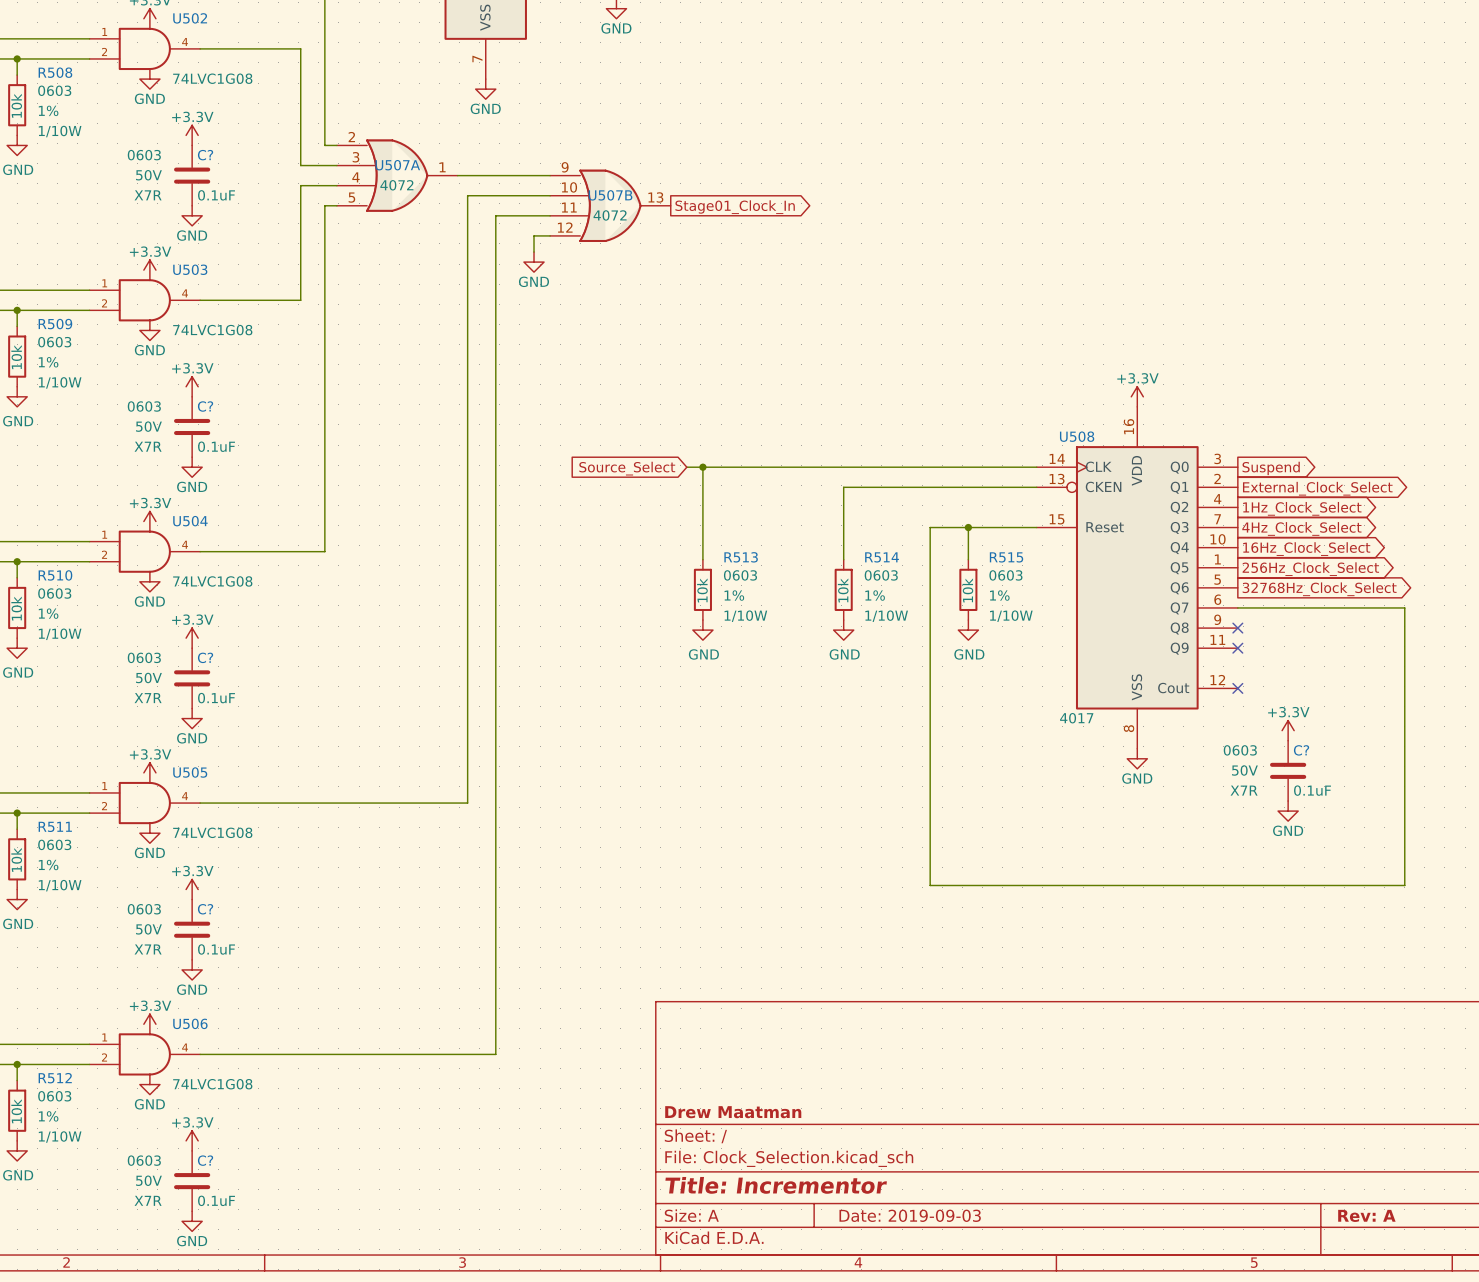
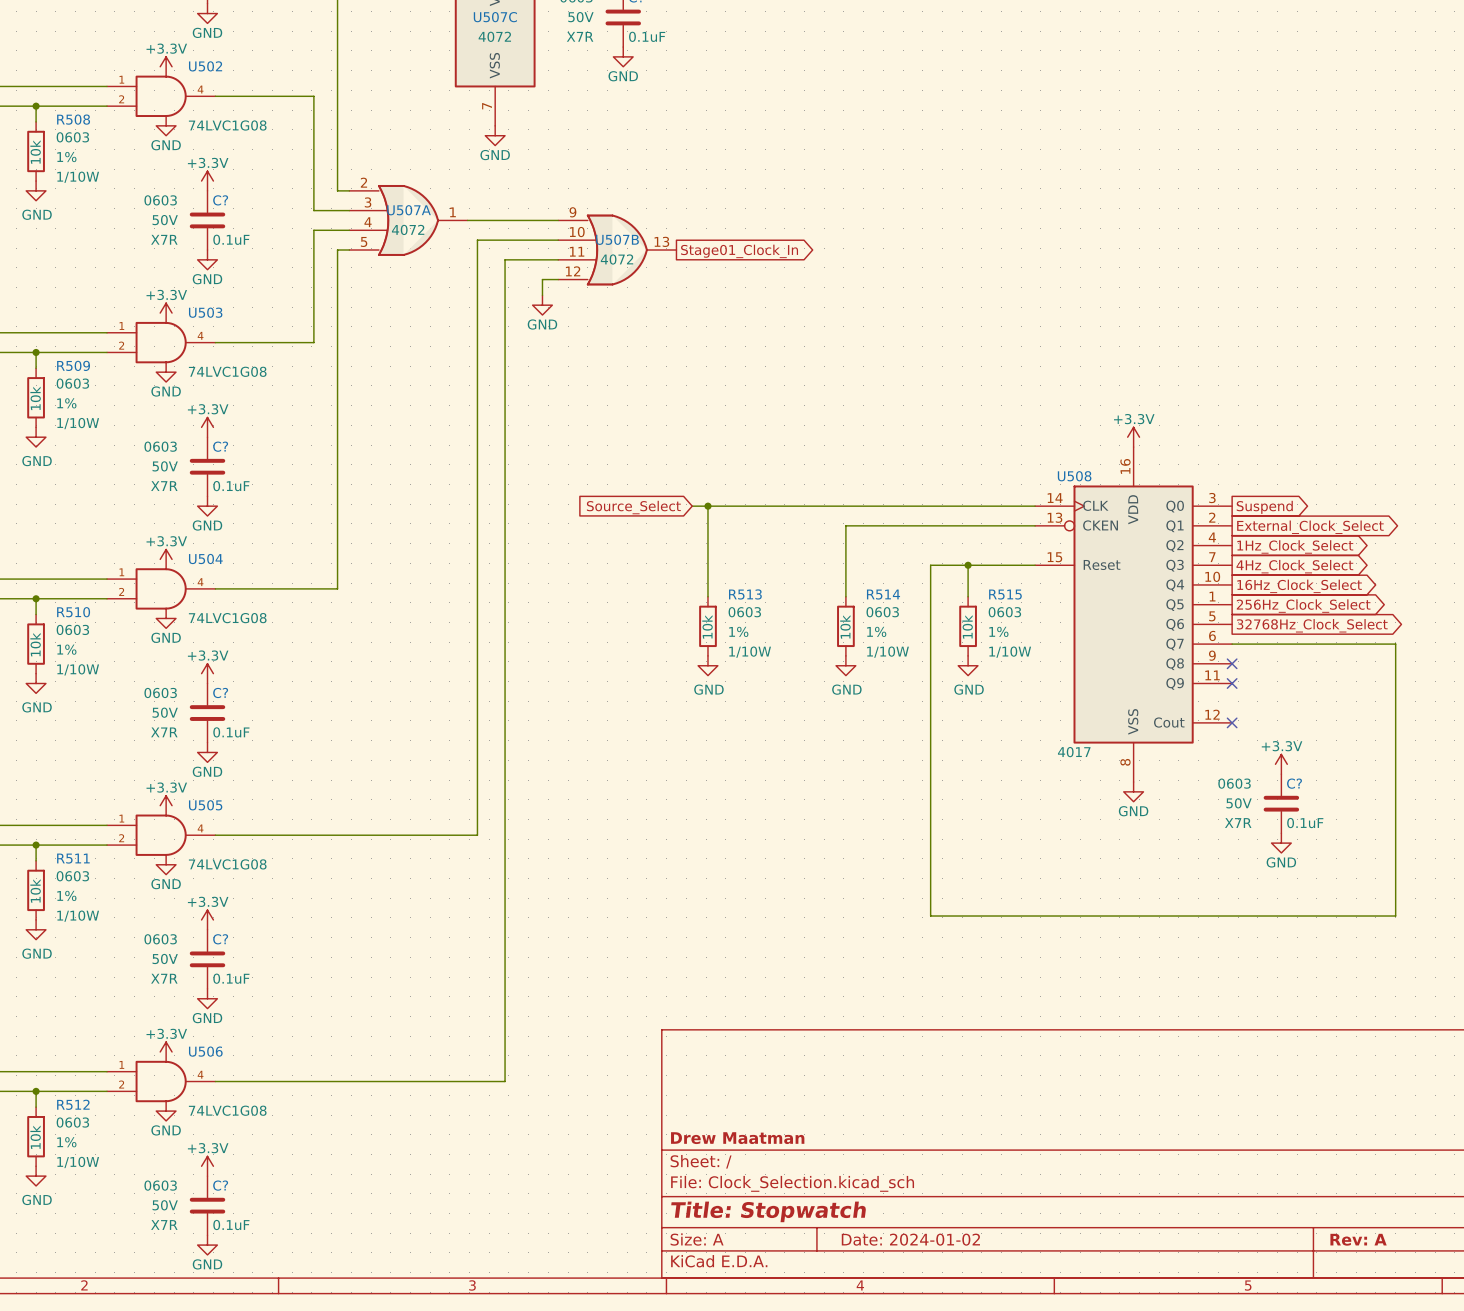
title block: Title: Incrementor (776, 1185) -> Title: Stopwatch (768, 1211)
title block: Date: 2019-09-03 (910, 1215) -> Date: 2024-01-02 (910, 1239)

